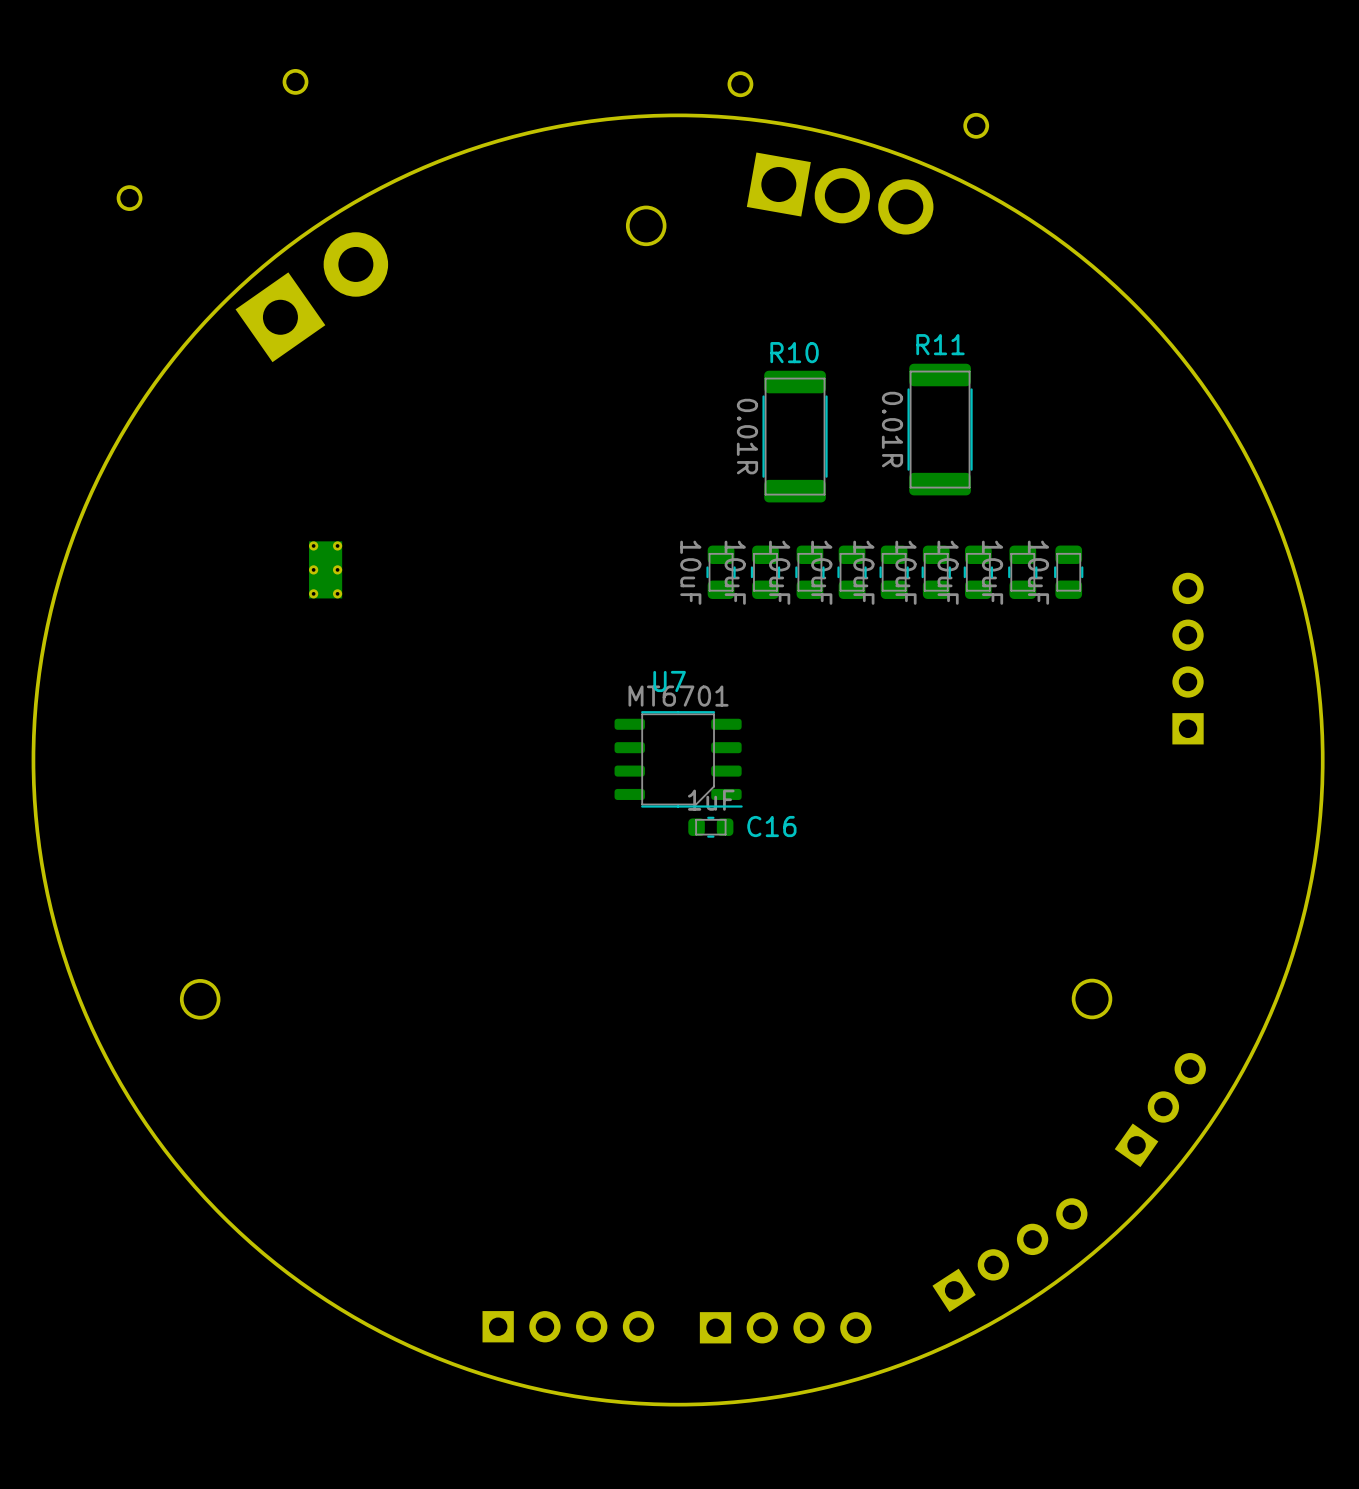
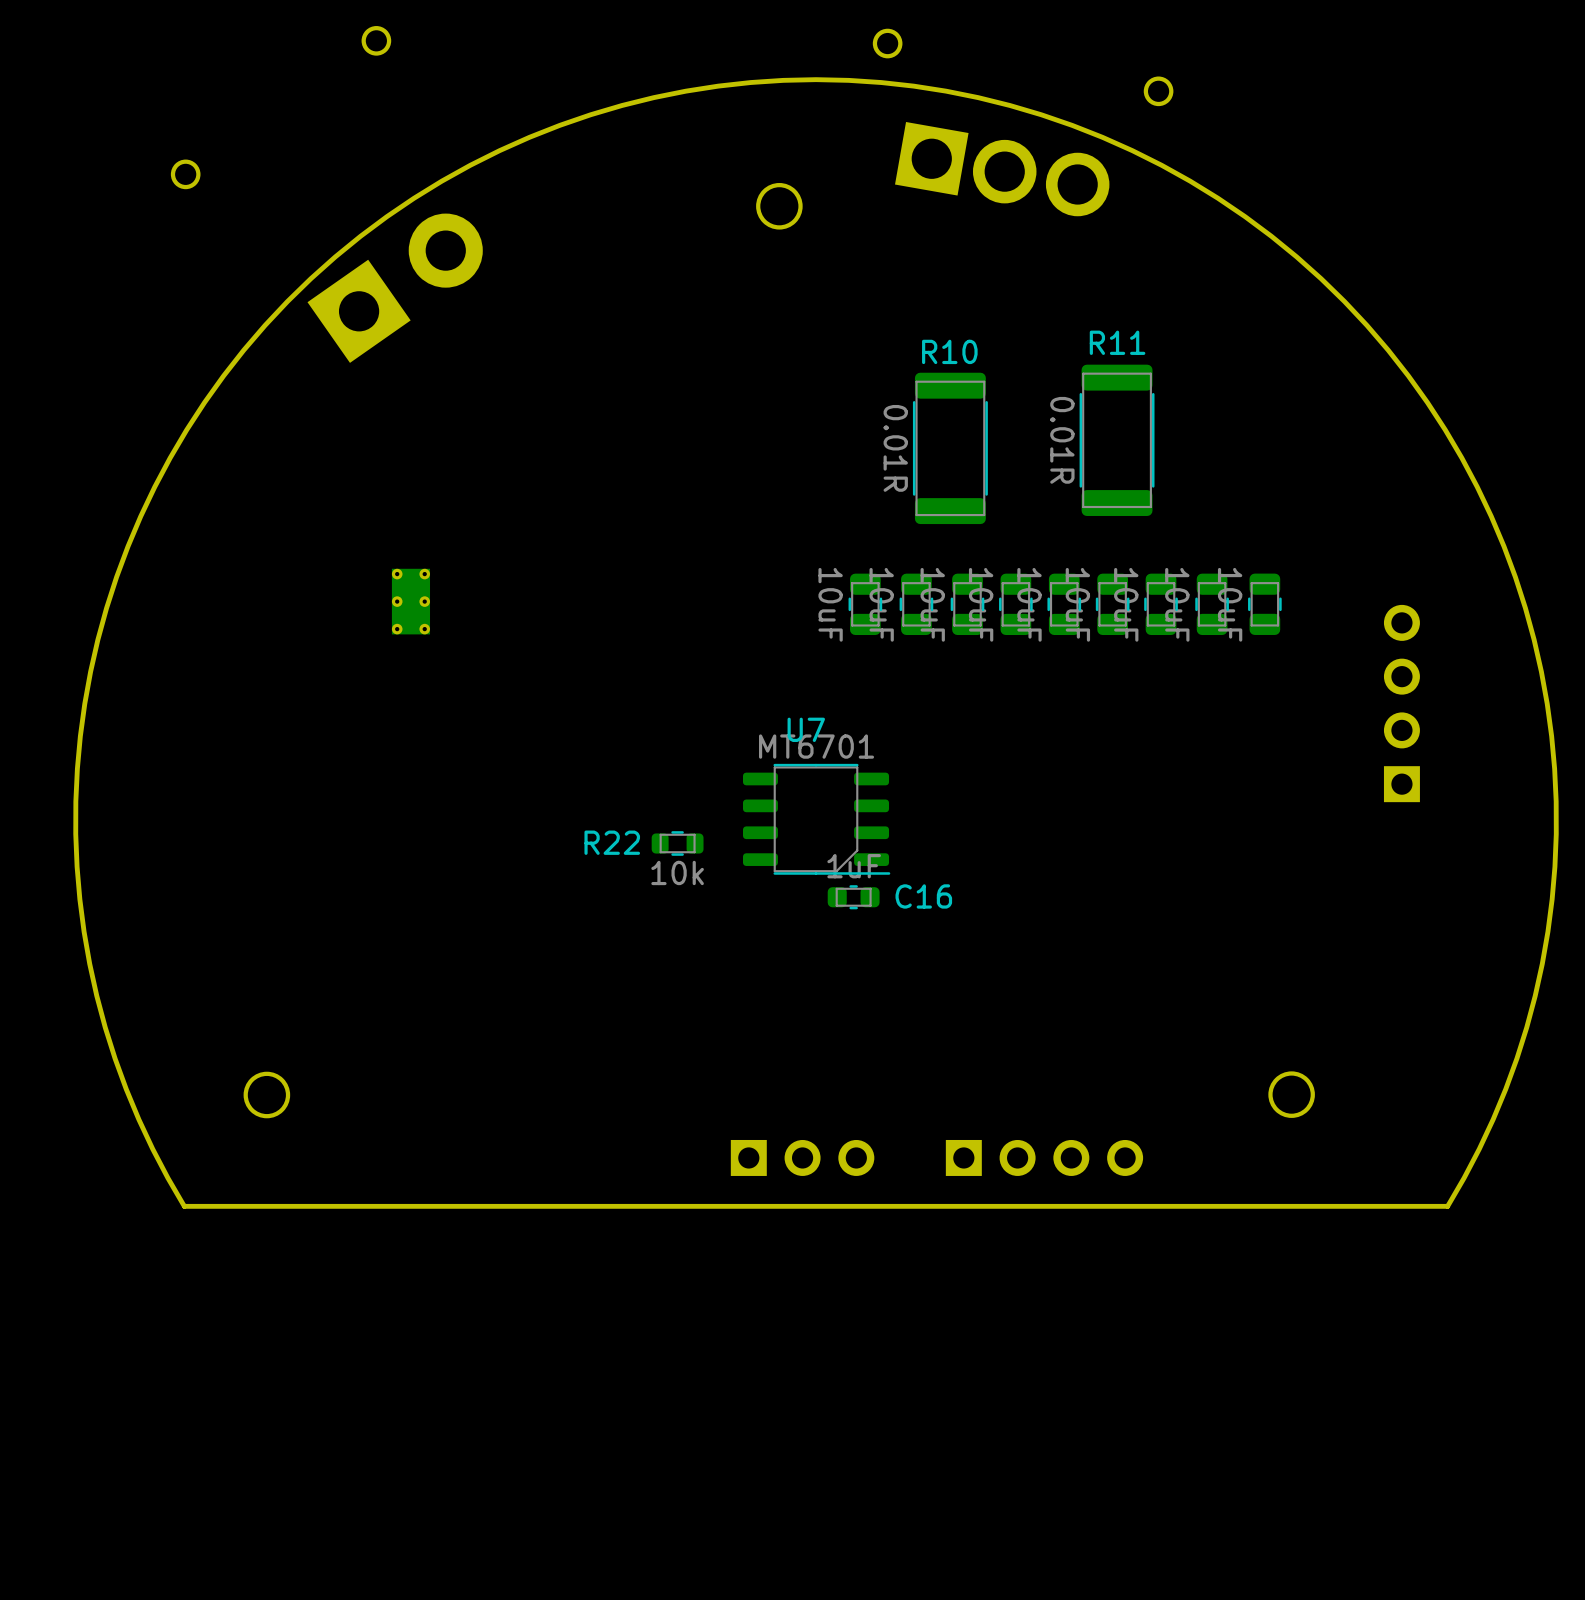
round board edge: [31, 113, 1325, 1407] -> none
R22: none -> 10k (677, 843)
part: none -> (802, 1157)
part: none -> (1044, 1157)
board edge: none -> (1447, 1206) (184, 1206) (138, 1119) (105, 1027) (84, 931) (75, 834) (80, 736) (97, 639) (116, 577) (140, 516) (186, 429) (223, 375) (265, 325) (335, 256) (386, 216) (470, 165) (529, 137) (590, 114) (653, 97) (718, 86) (816, 79) (881, 82) (946, 91) (1009, 105) (1072, 125) (1132, 150) (1190, 181) (1245, 216) (1296, 256) (1366, 325) (1408, 375) (1445, 429) (1491, 516) (1515, 577) (1534, 639) (1551, 736) (1556, 801) (1554, 866) (1547, 931) (1526, 1027) (1505, 1089) (1479, 1149) (1447, 1206)
part: (1160, 1110) -> none
part: (1009, 1255) -> none
part: (568, 1326) -> none
part: (785, 1327) -> none

